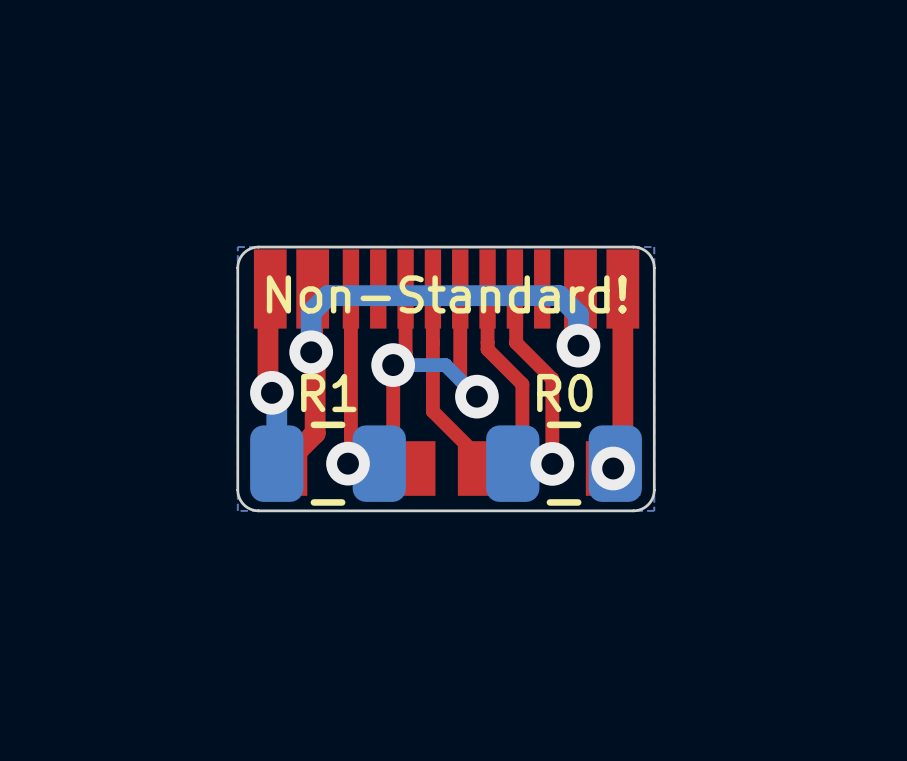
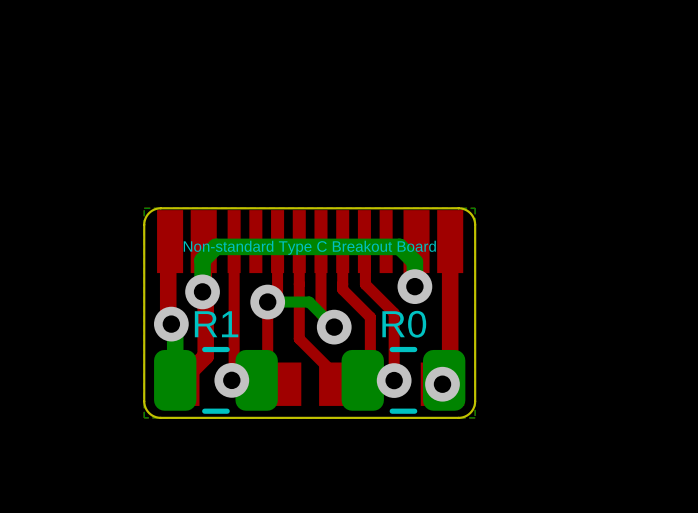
text: Non-Standard! (446, 294) -> Non-standard Type C Breakout Board (309, 247)

